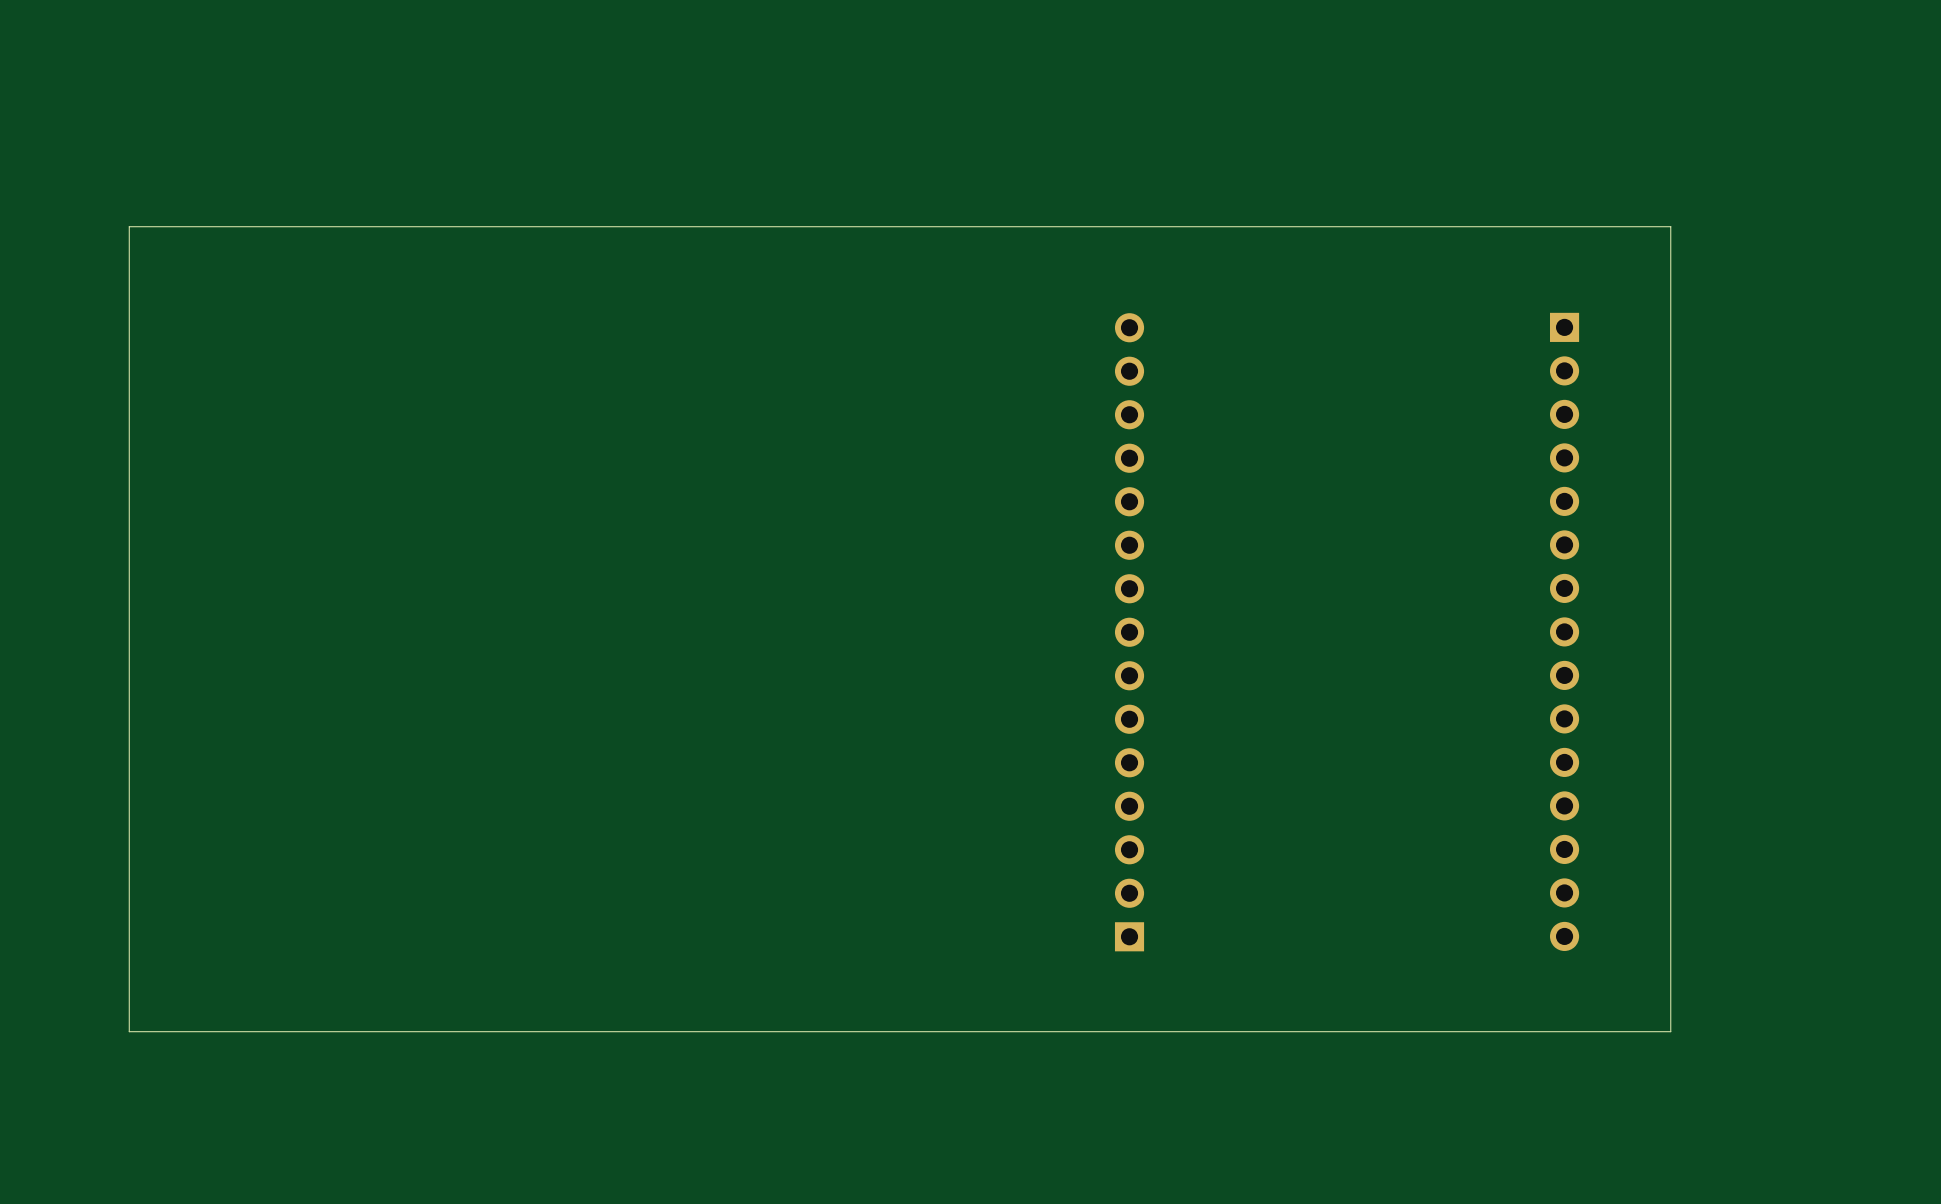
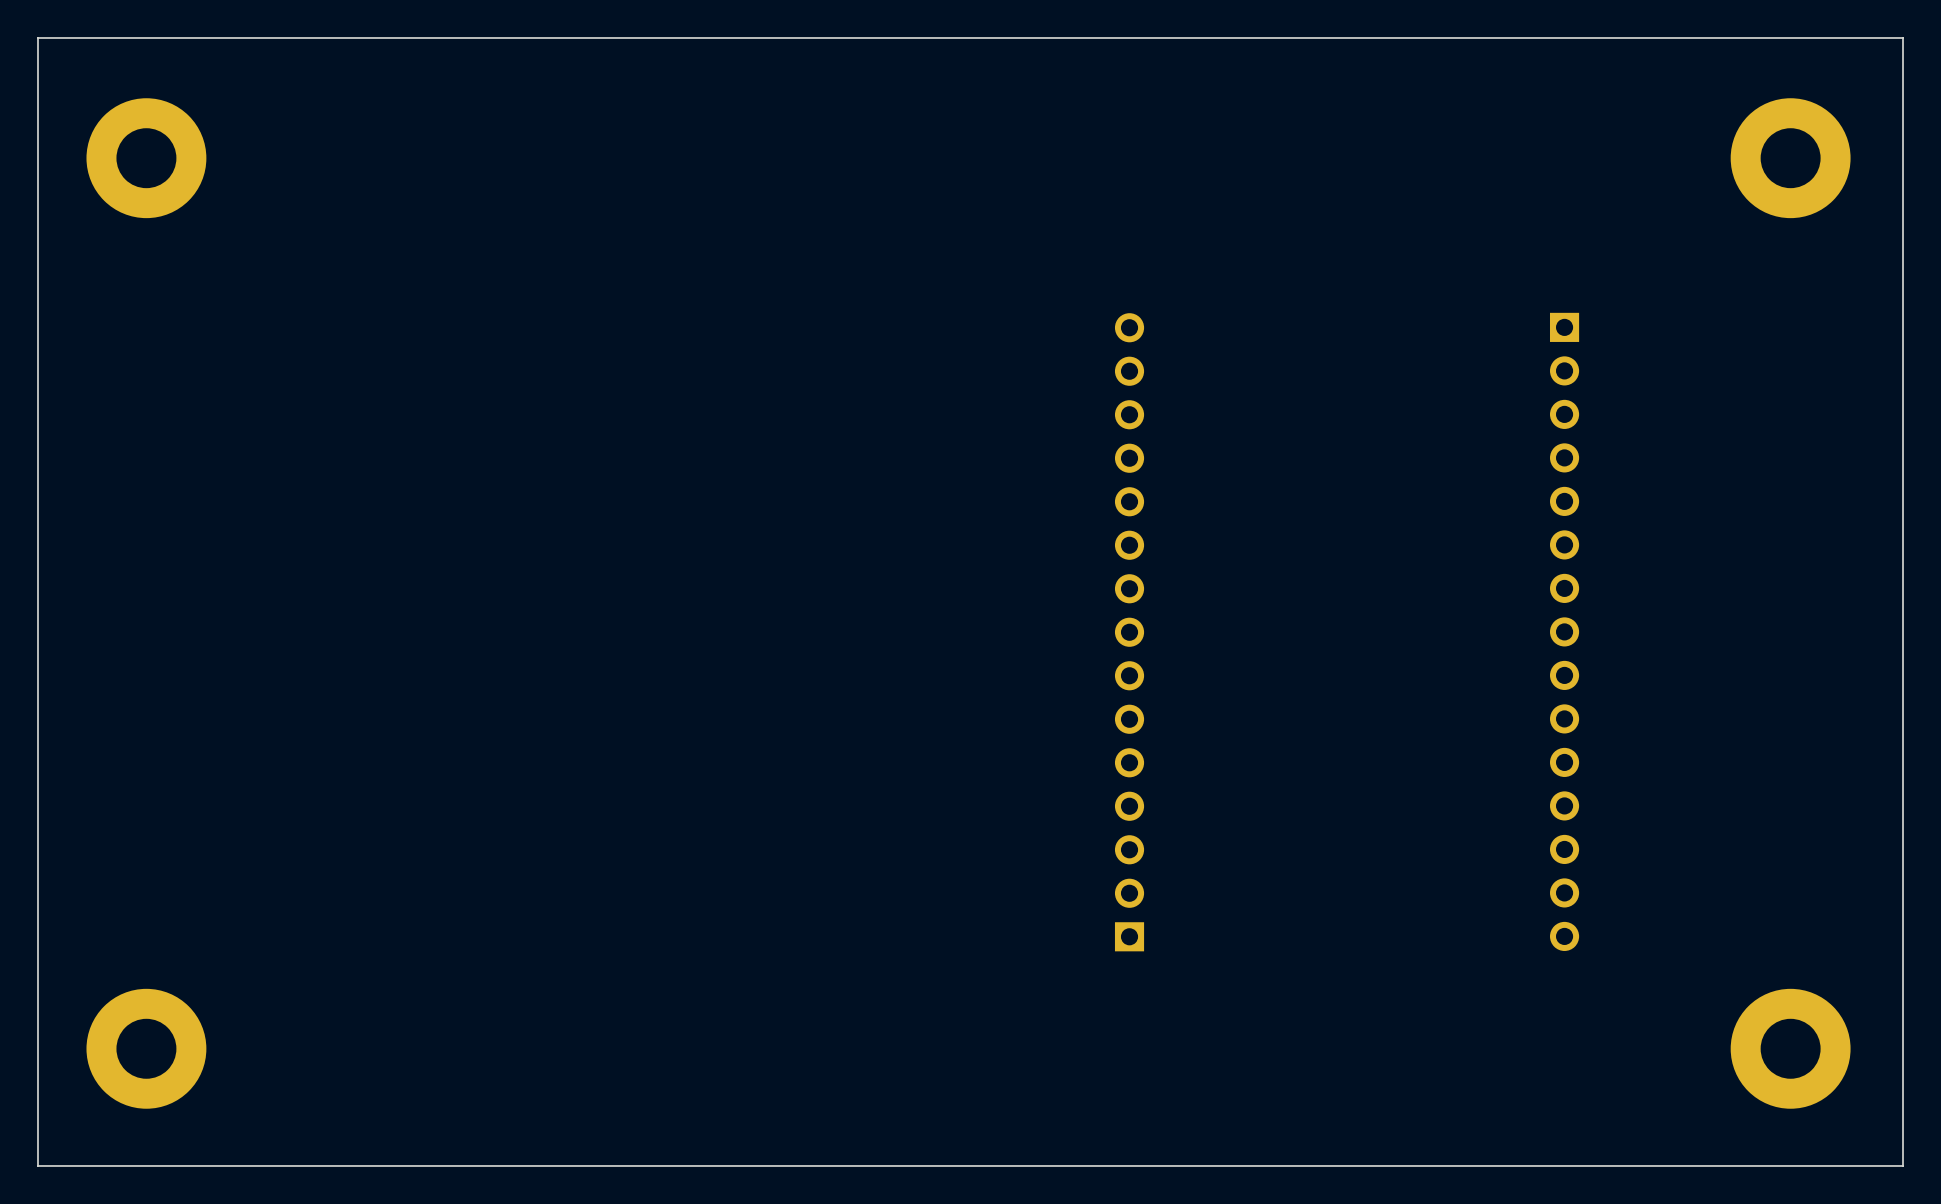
part: none -> (146, 158)
part: none -> (1790, 158)
board edge: (1670, 226) (129, 226) (129, 1031) (1670, 1031) (1670, 226) -> (1902, 37) (1902, 1165) (37, 1165) (37, 37) (1902, 37)
part: none -> (146, 1048)
part: none -> (1790, 1048)

